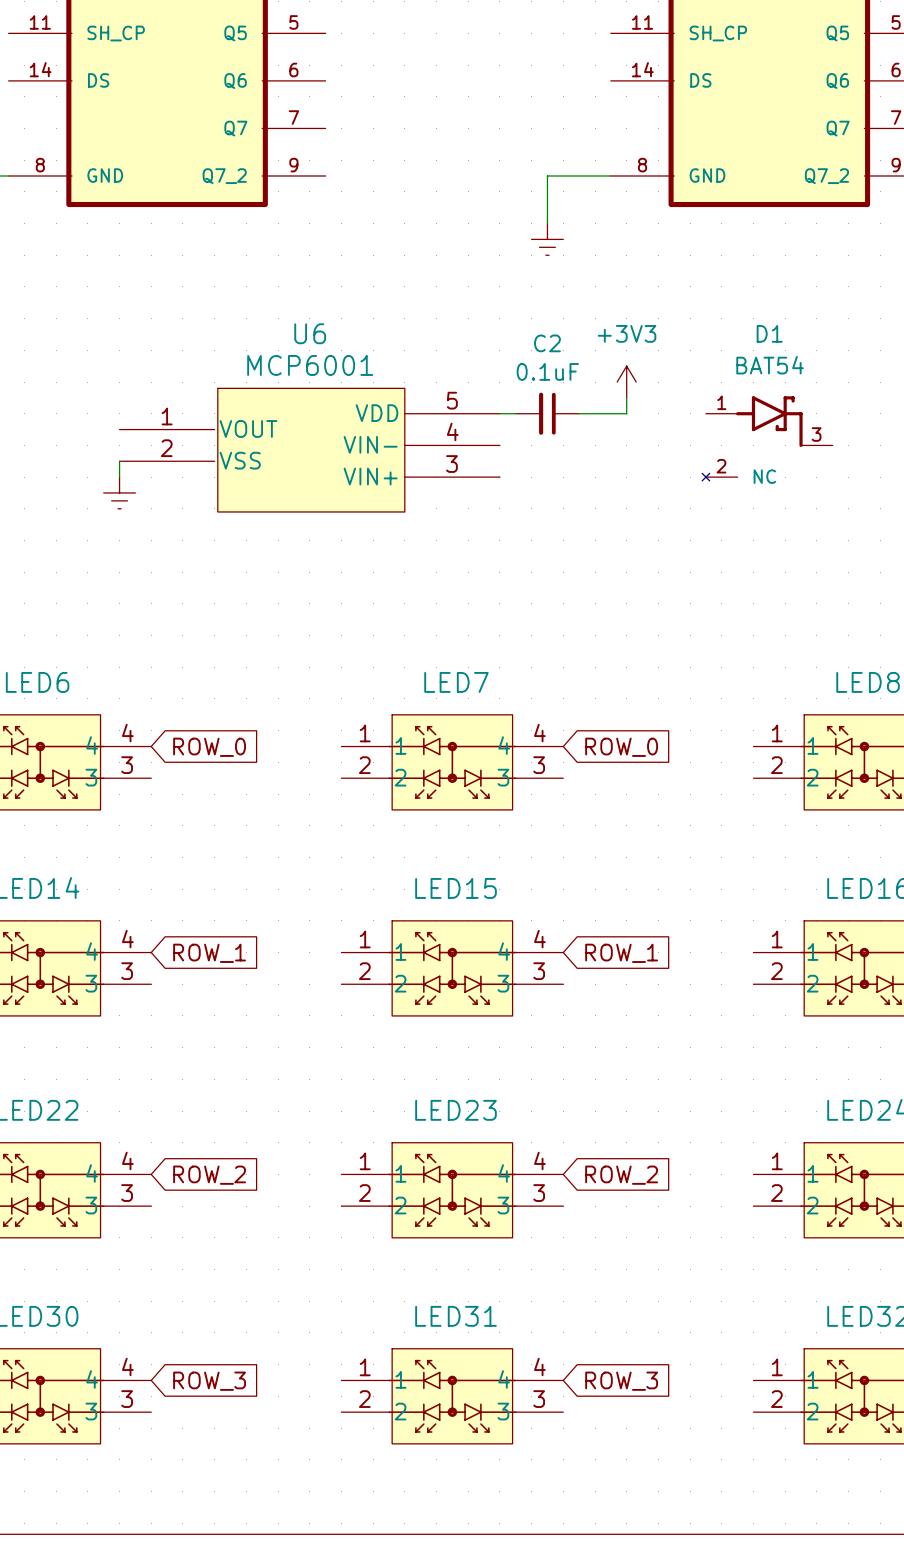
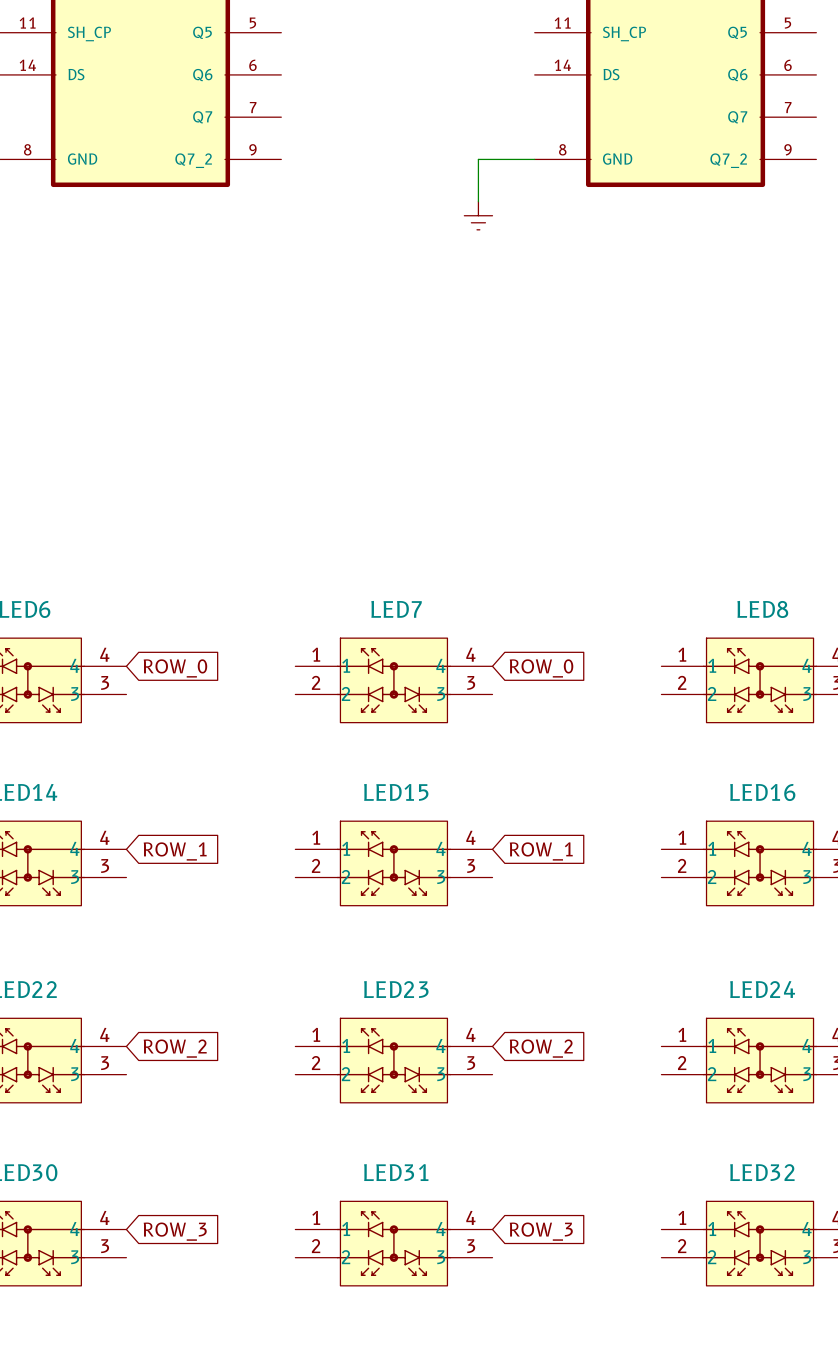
power symbol: +3V3 (626, 382) -> none
wire: (626, 397) (626, 413) (579, 413) -> none
wire: (499, 413) (515, 413) -> none
C2: 0.1uF (547, 413) -> none
D1: BAT54 (767, 438) -> none
U6: MCP6001 (309, 450) -> none
wire: (119, 461) (119, 477) -> none
power symbol: (119, 492) -> none

